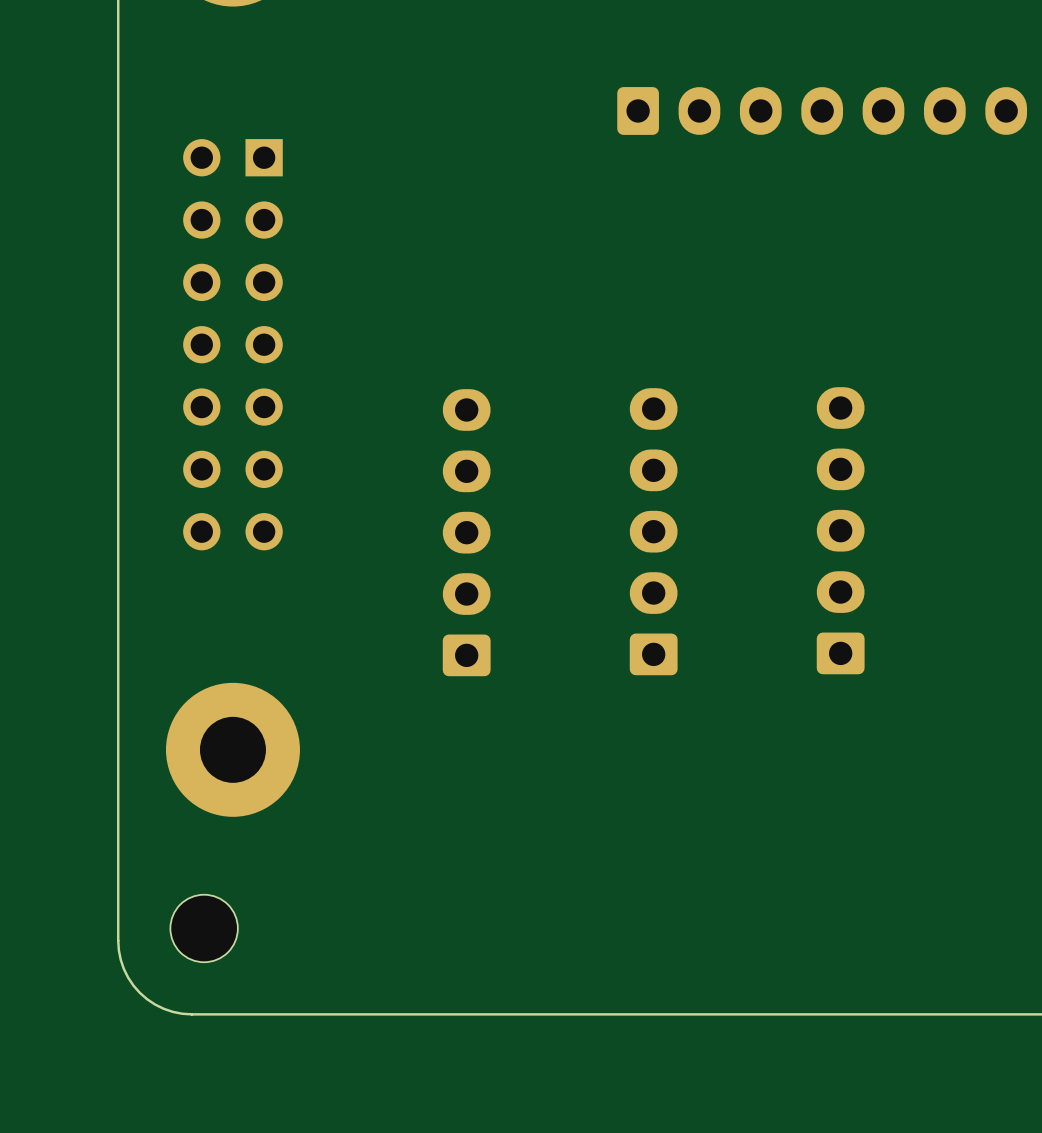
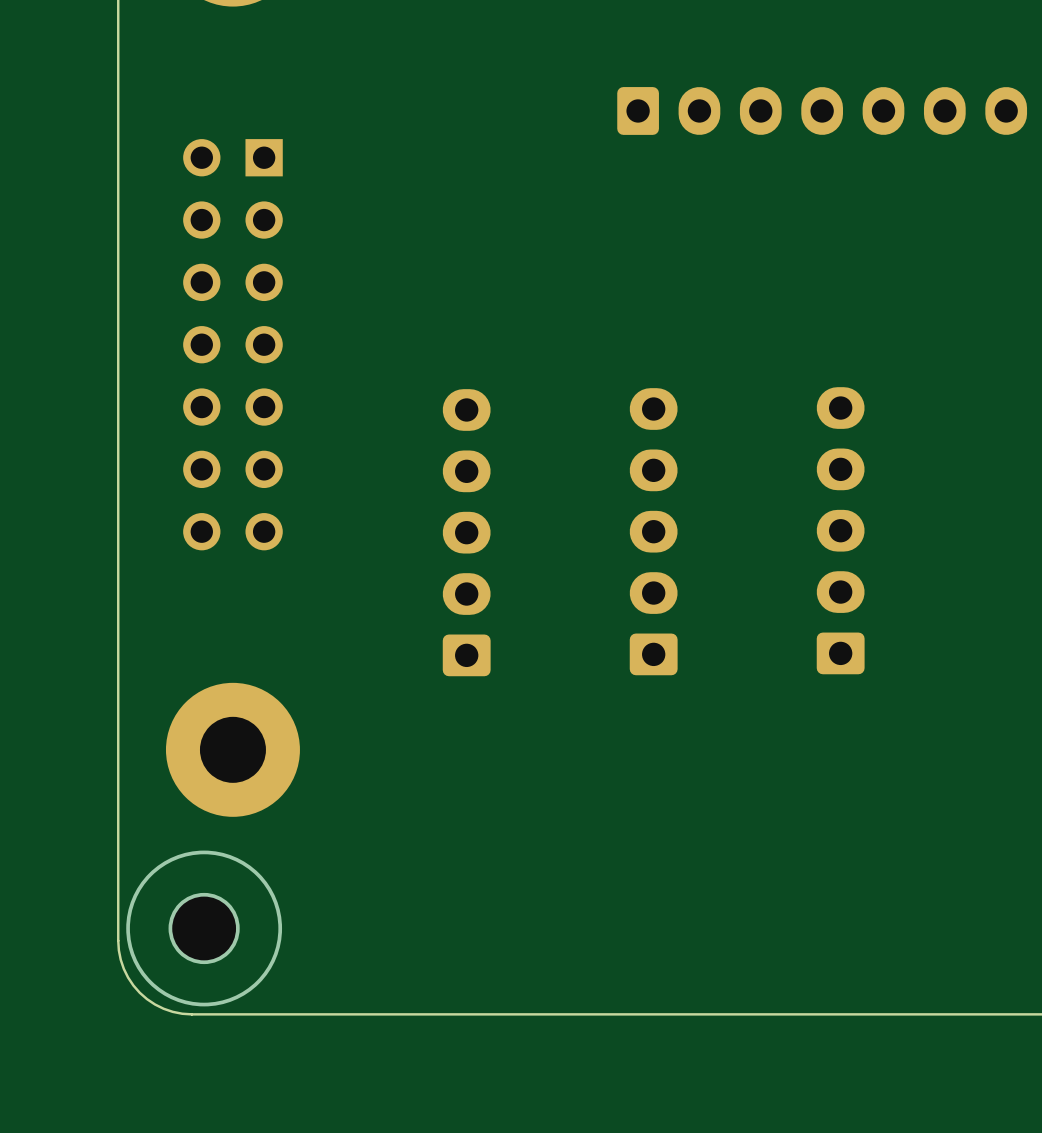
part footprint: [170, 894, 238, 963] -> [126, 850, 283, 1007]

